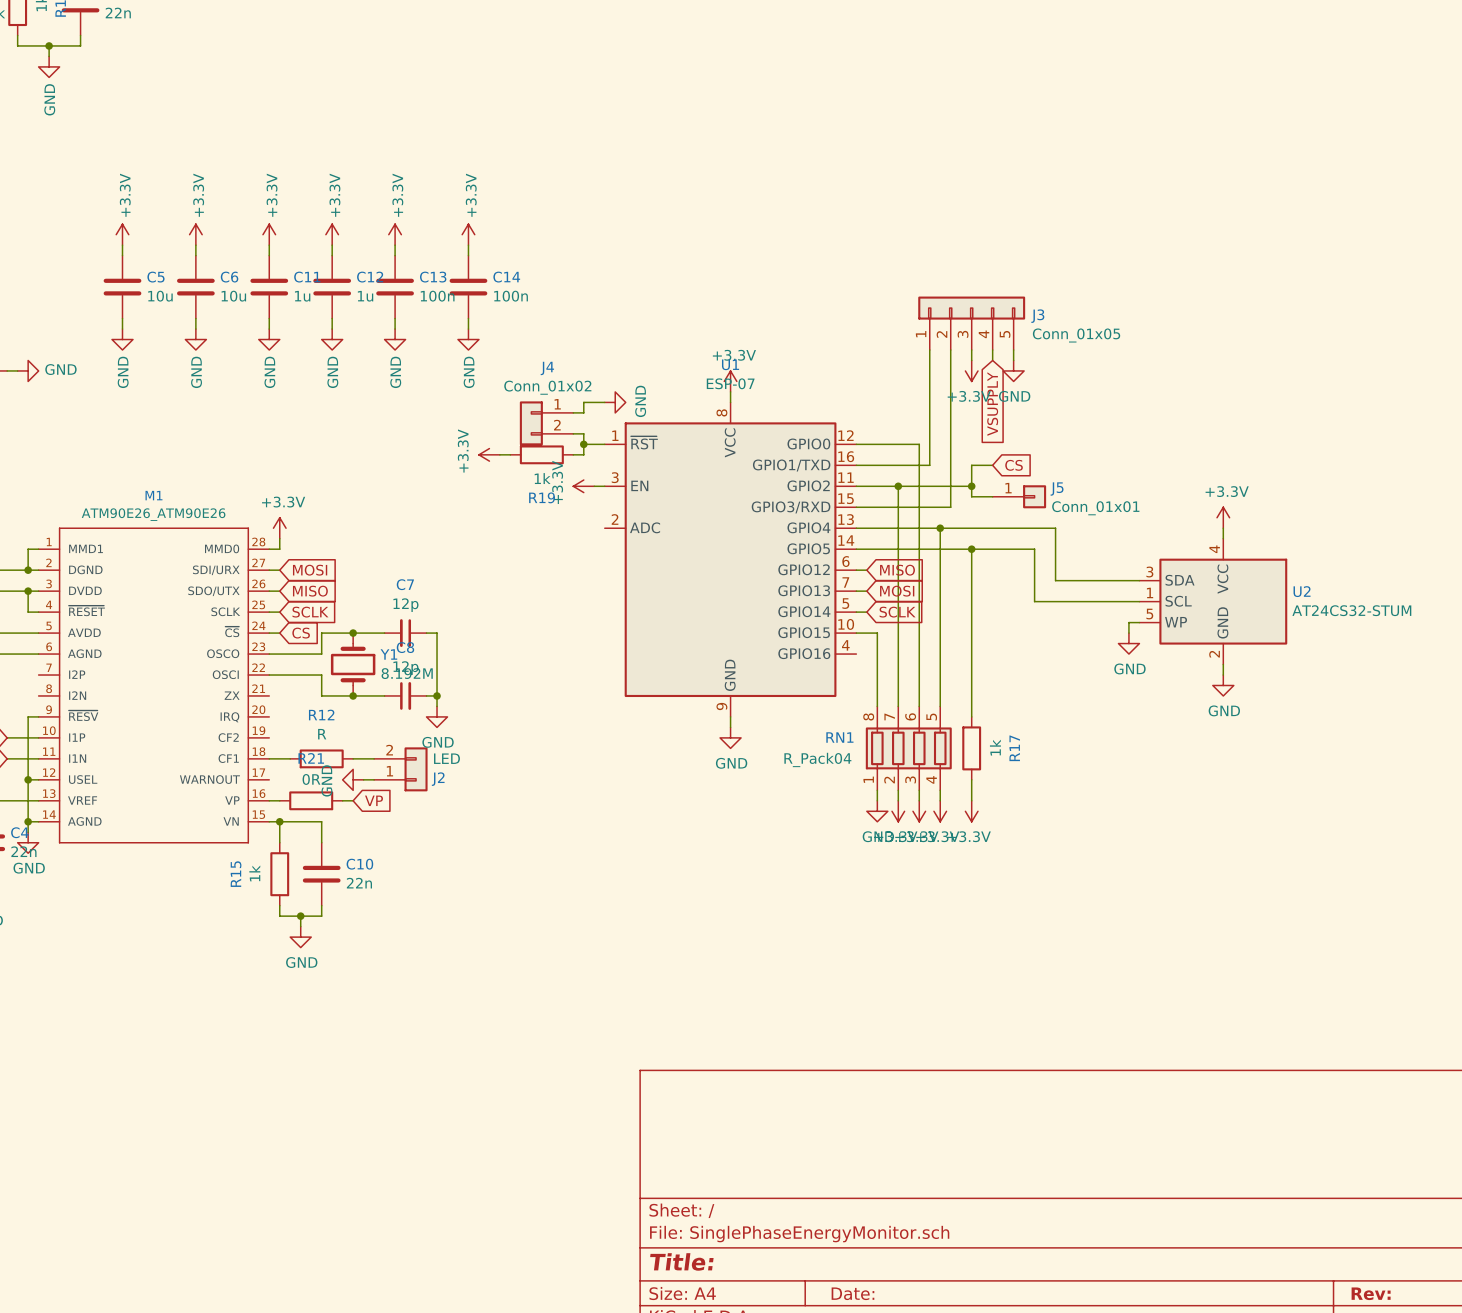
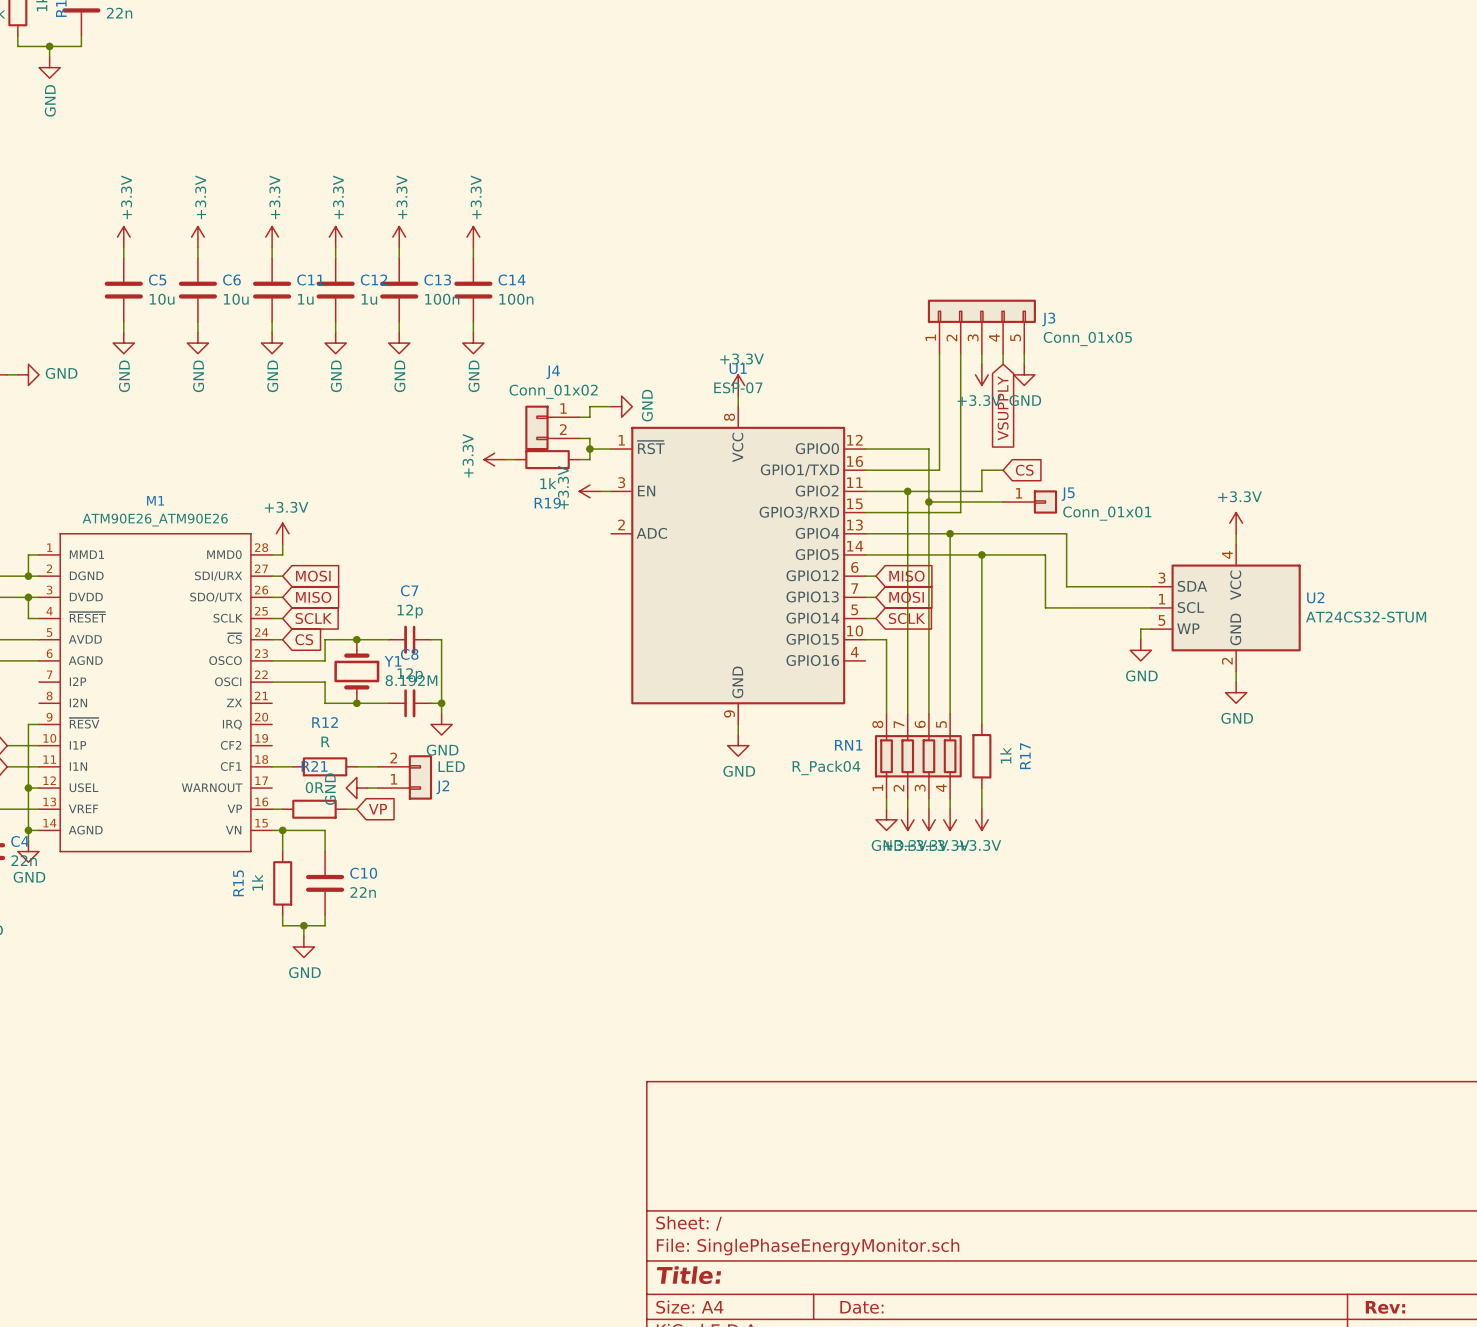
wire: (971, 486) (971, 496) -> (928, 501) (981, 501)
junction: (971, 486) -> none
junction: none -> (928, 501)

